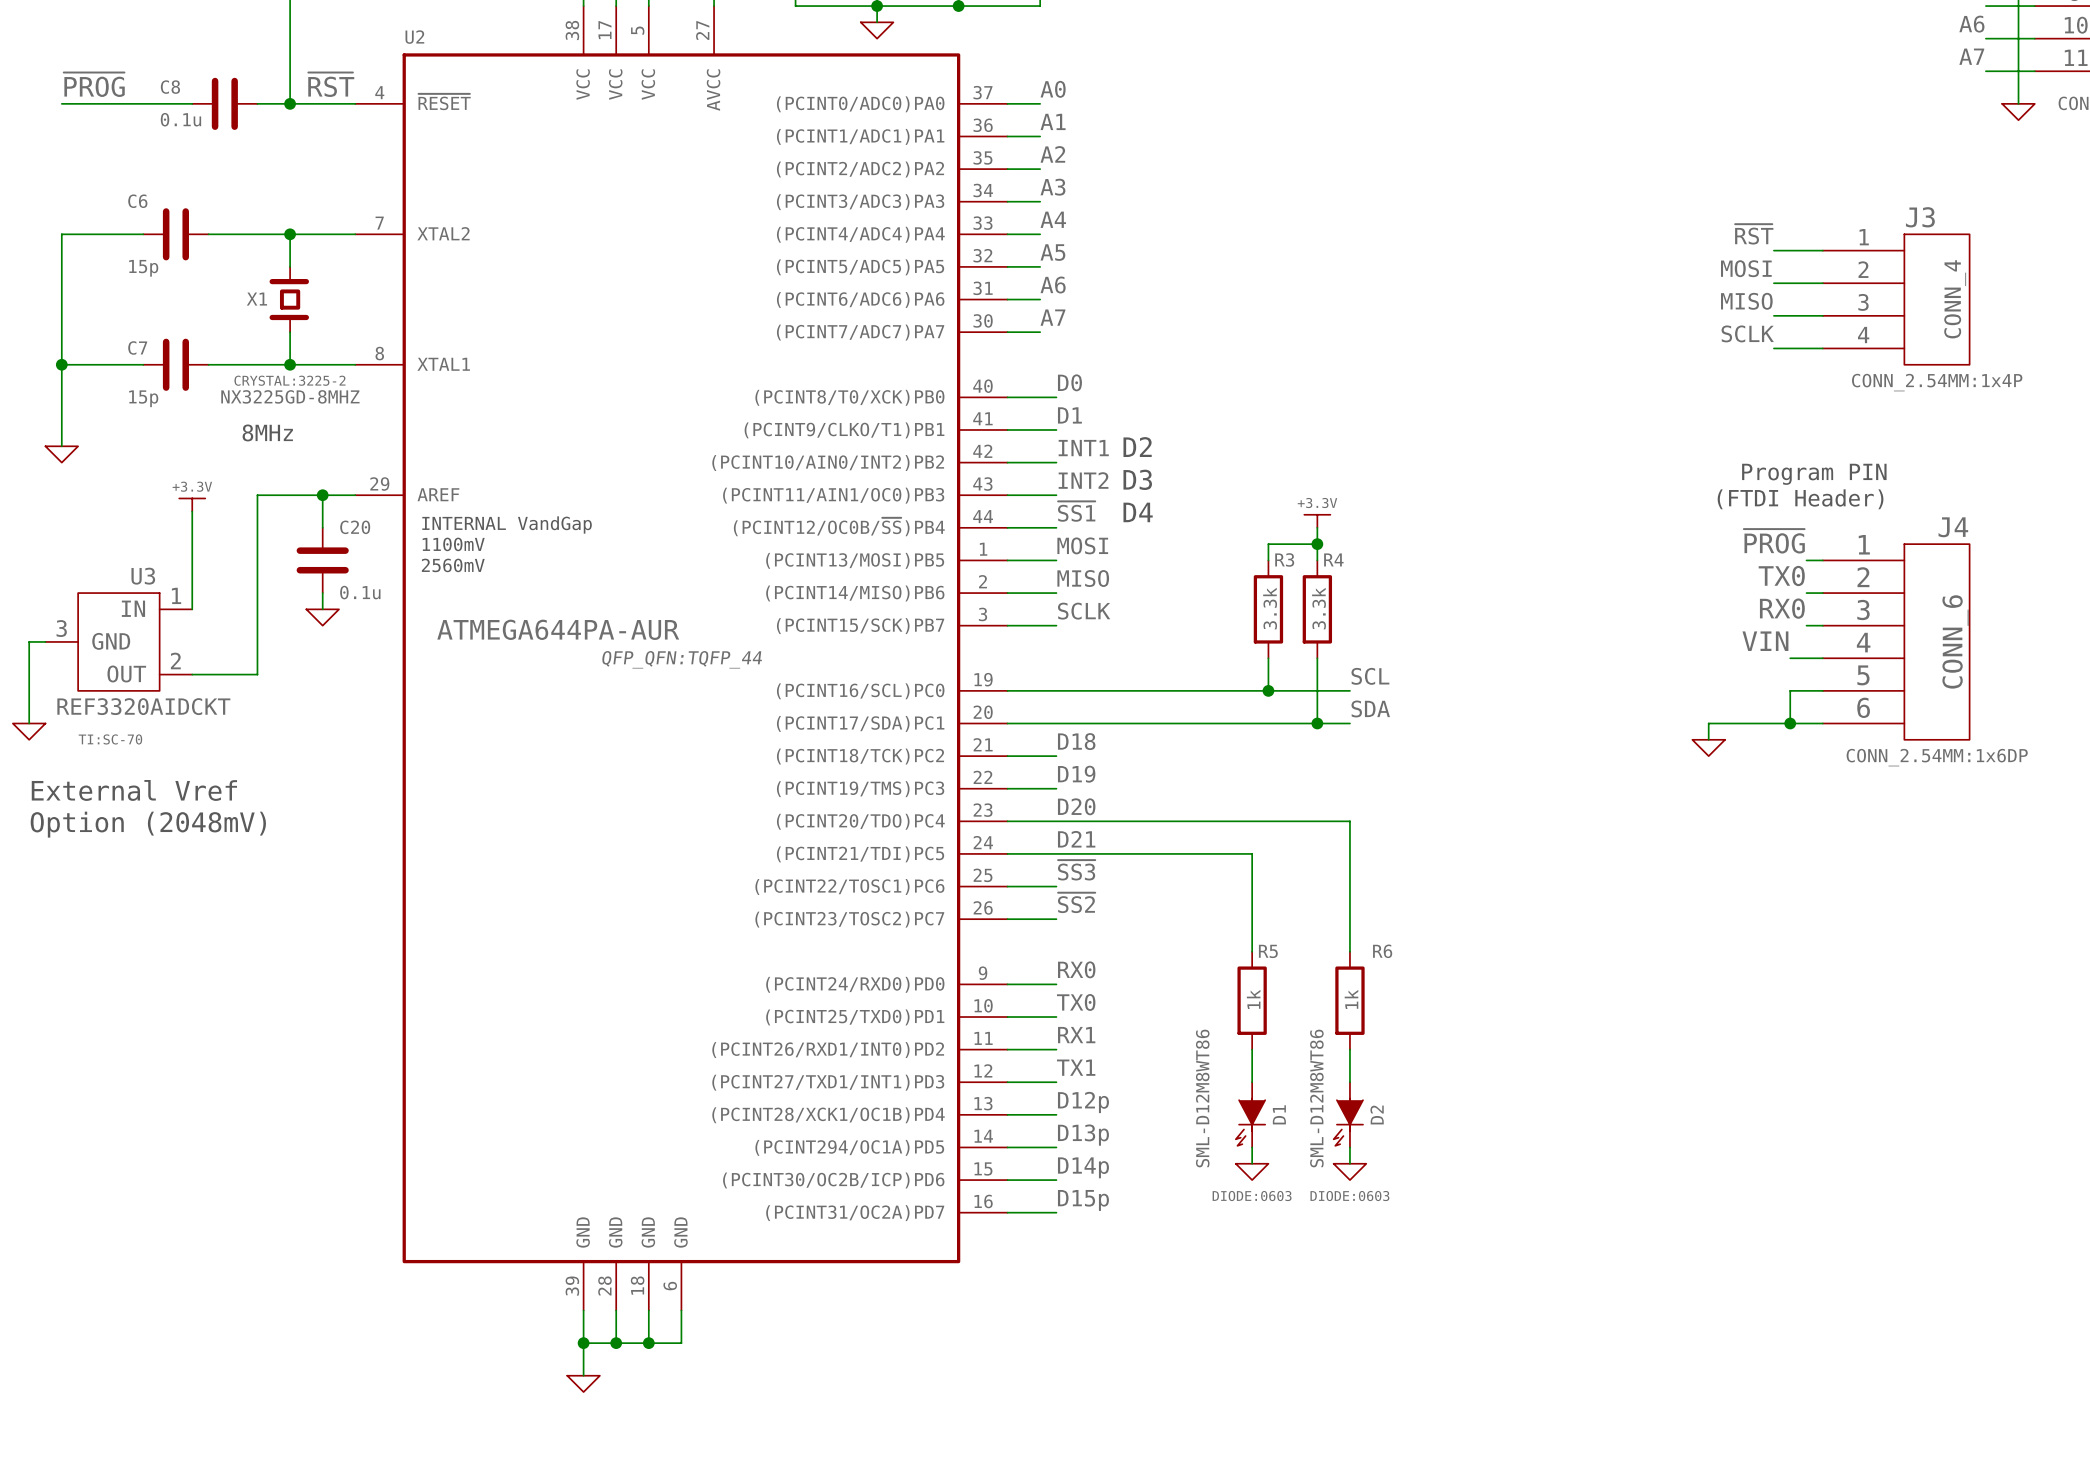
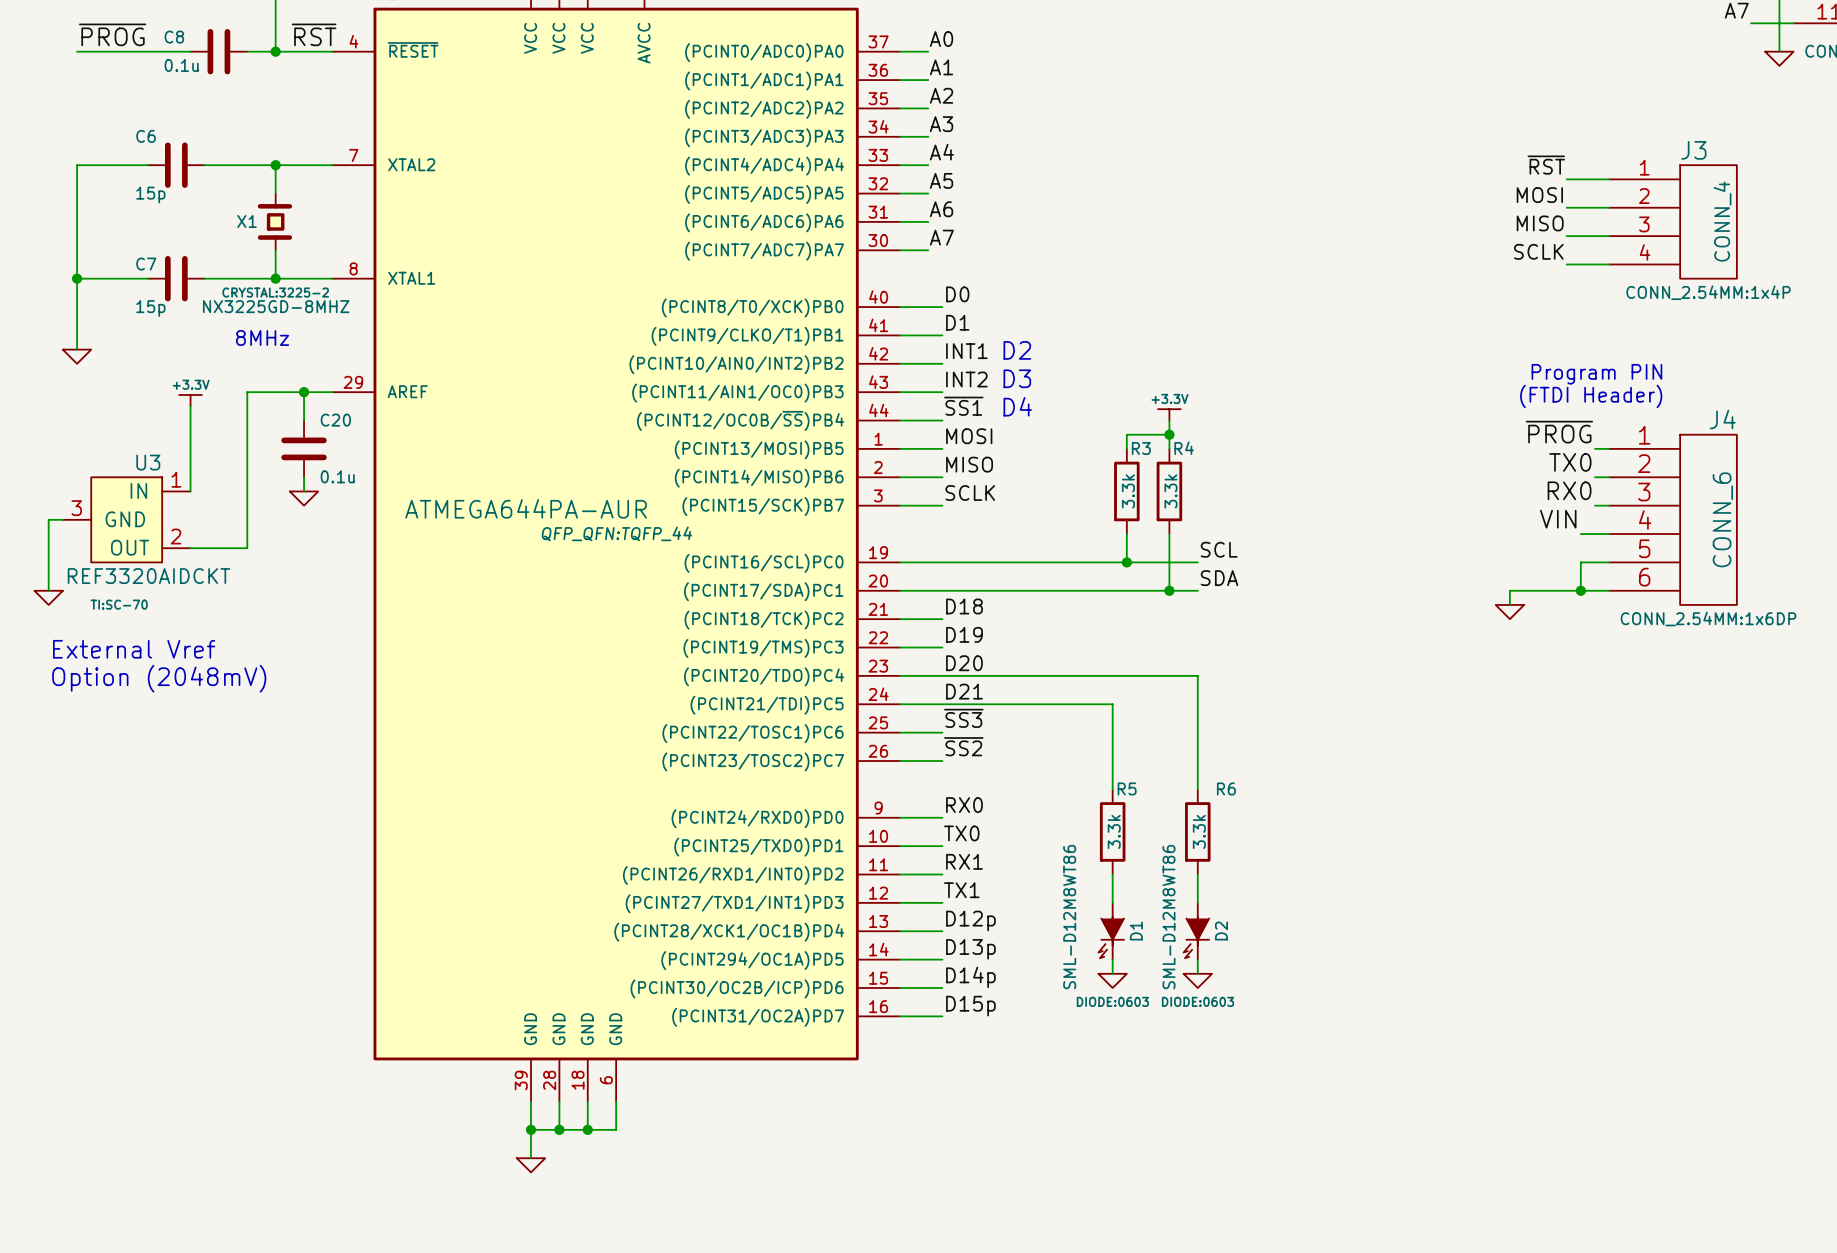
text: INTERNAL VandGap (507, 525) -> none
text: 1100mV (453, 544) -> none
text: 2560mV (453, 565) -> none
R5 value: 1k (1253, 999) -> 3.3k (1114, 831)
R6 value: 1k (1351, 999) -> 3.3k (1199, 831)

